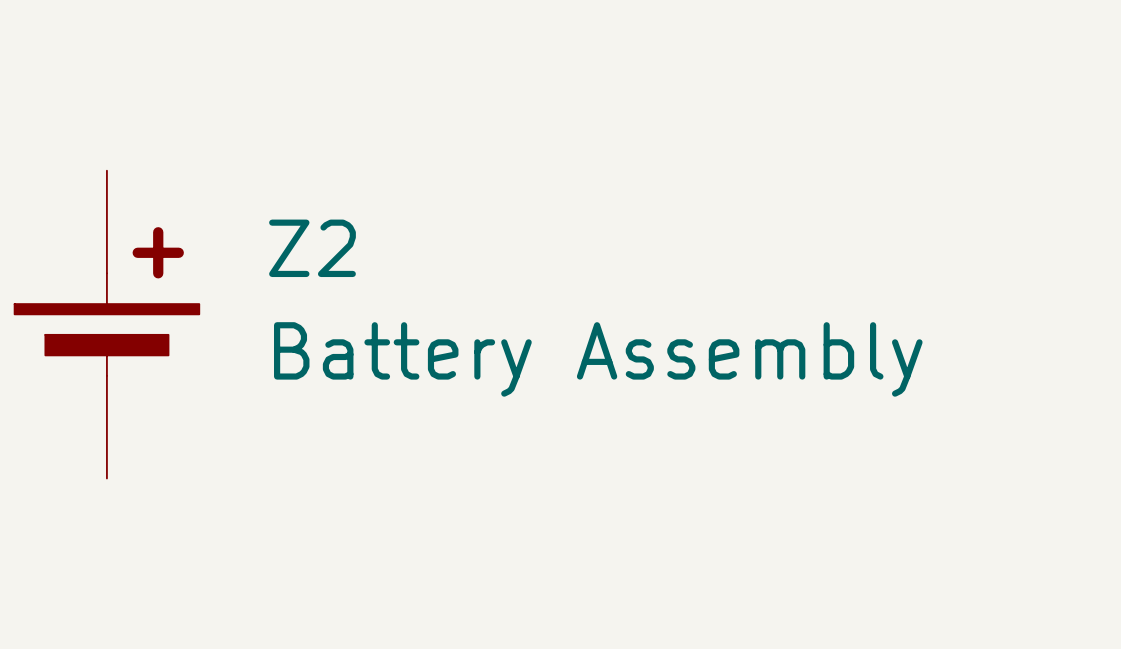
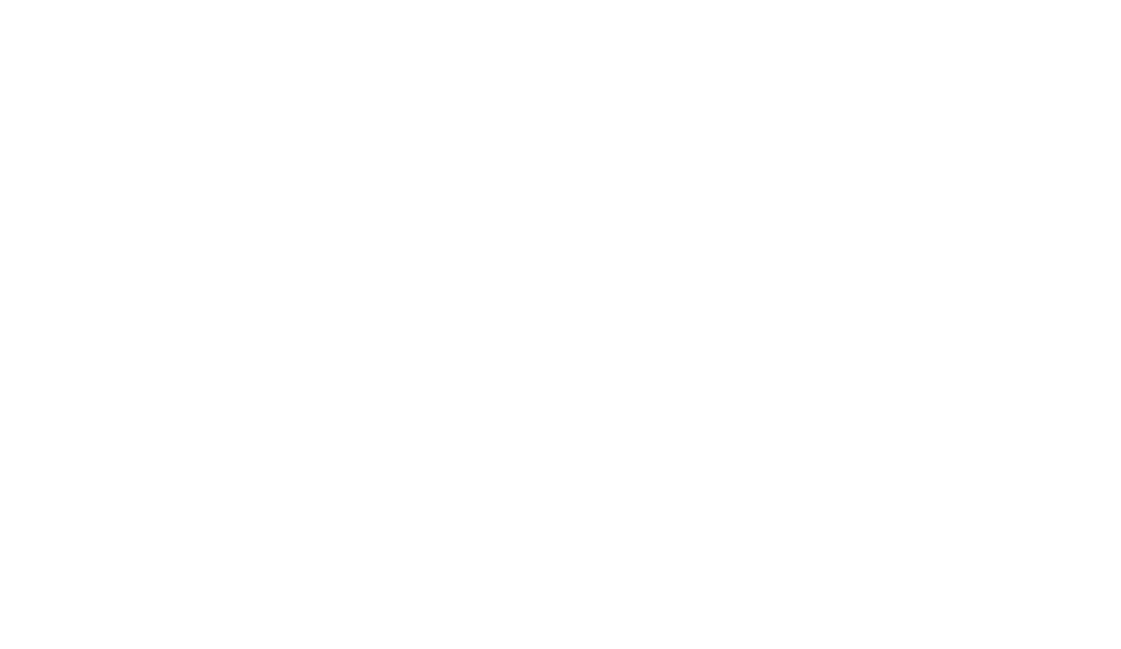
Z2: Battery Assembly (106, 324) -> none

